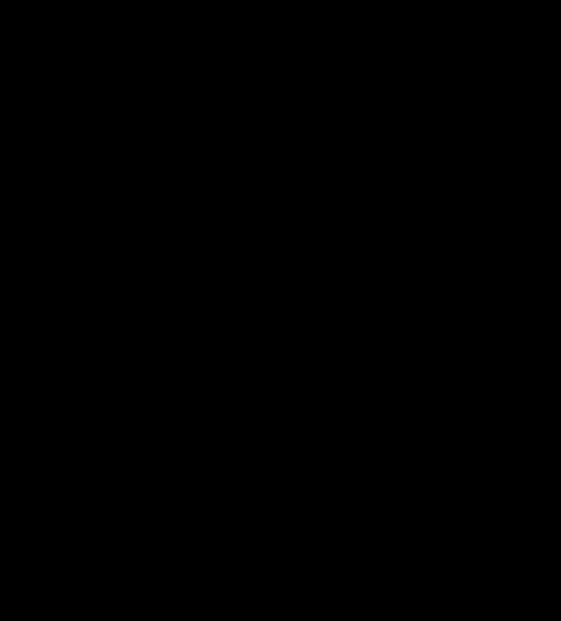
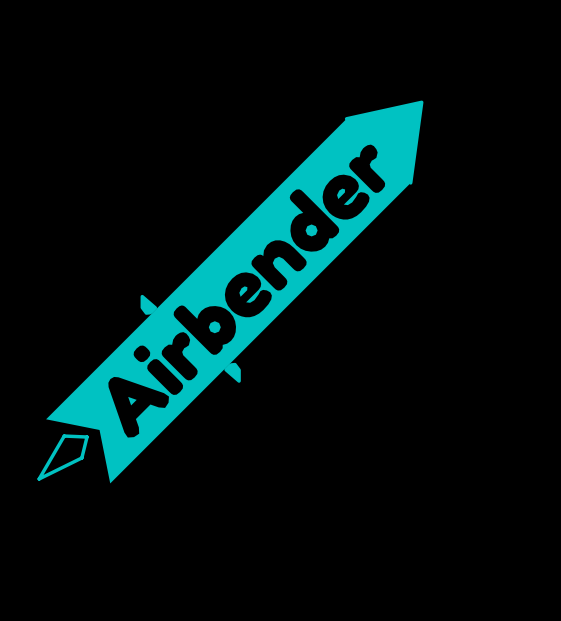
drawing: none -> [46, 100, 424, 484]
line: none -> (64, 436) (87, 437) (81, 457) (39, 478) (64, 436)

